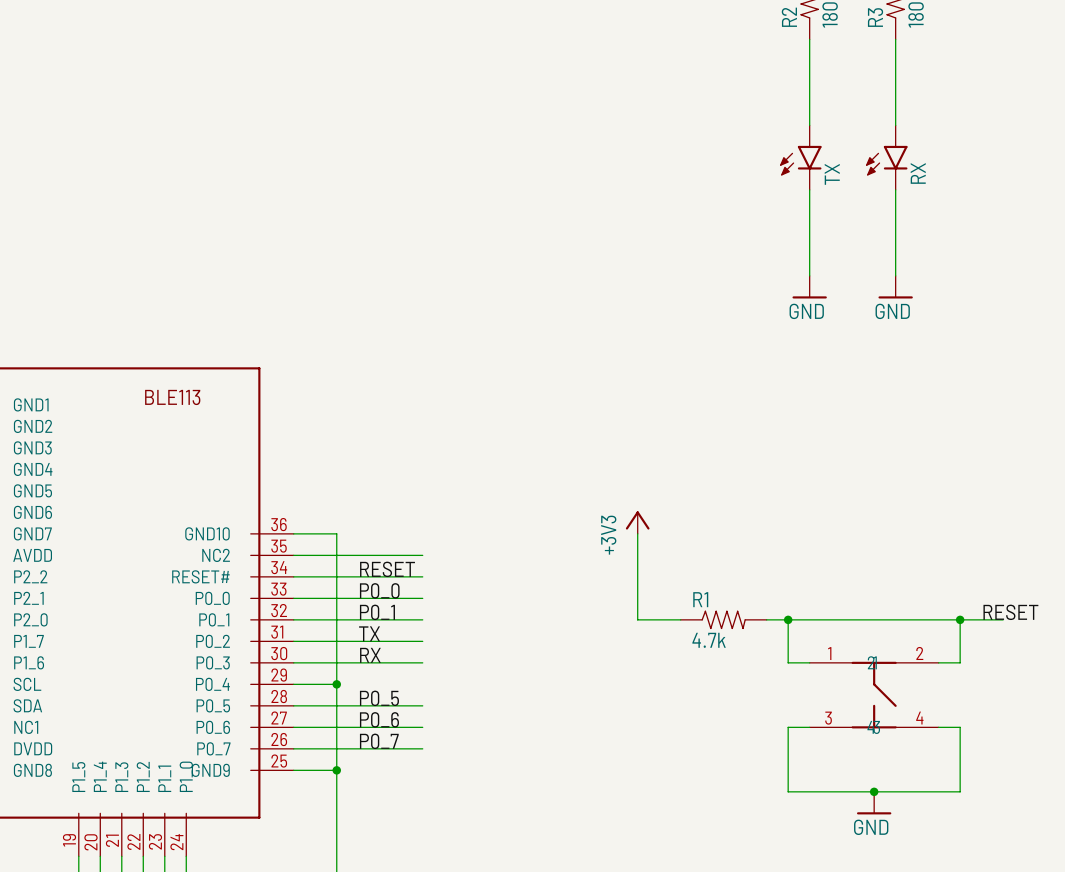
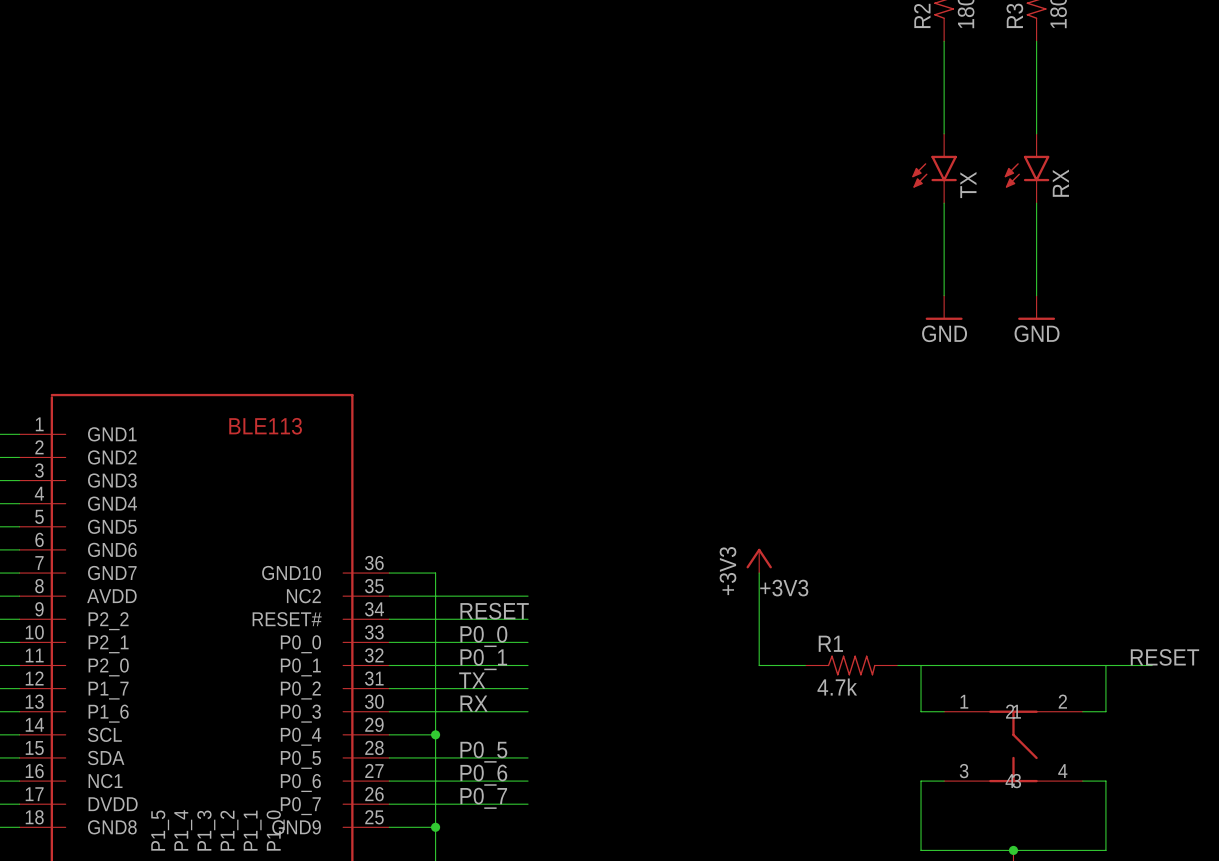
label: none -> +3V3 (784, 588)
junction: (788, 619) -> none
junction: (960, 619) -> none

